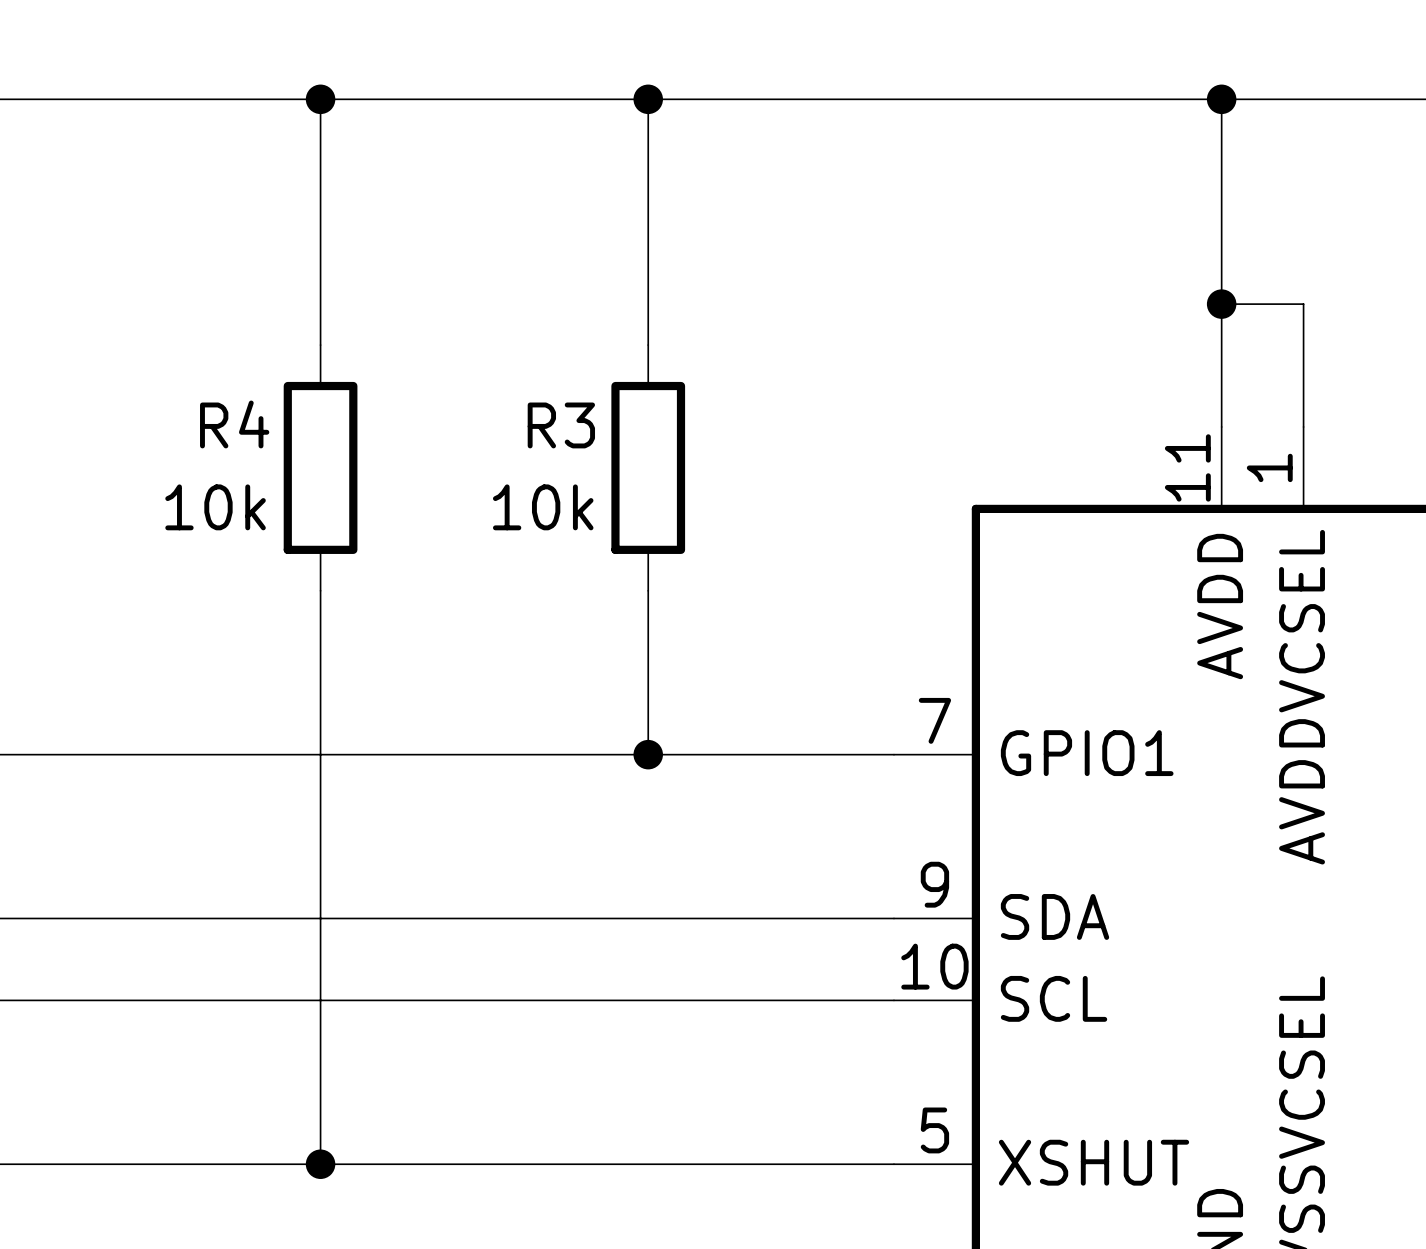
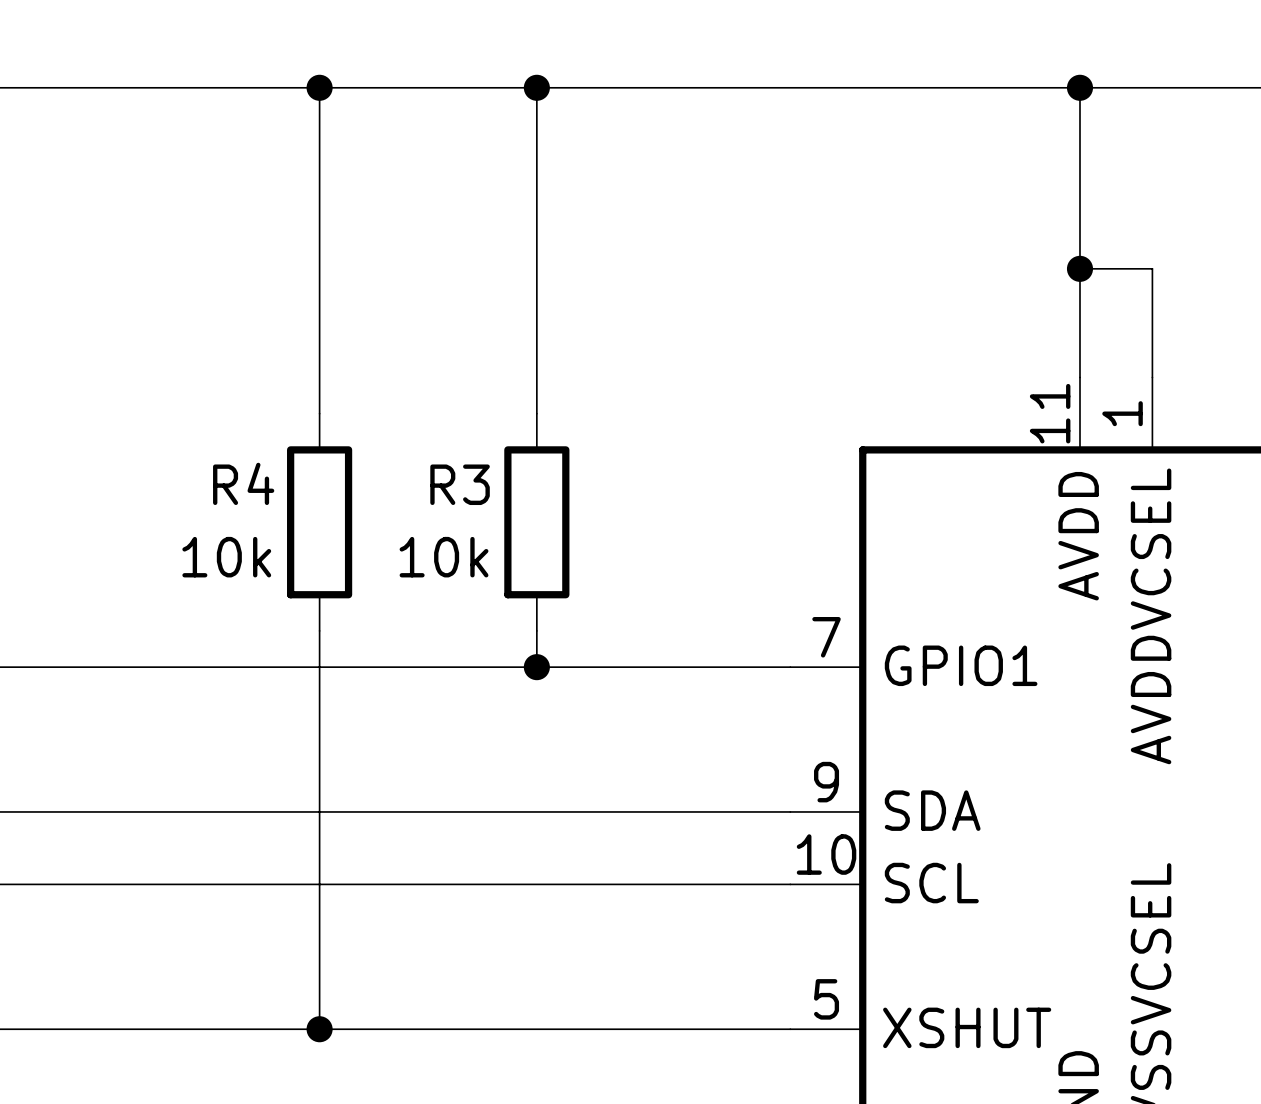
wire: (320, 99) (320, 345) -> none
junction position: (320, 99) -> (319, 87)
wire: none -> (319, 87) (319, 413)
wire: none -> (536, 87) (536, 413)
wire: (648, 99) (648, 345) -> none
junction position: (648, 99) -> (536, 87)
R4 position: (320, 467) -> (319, 522)
R3 position: (648, 467) -> (536, 522)
wire: (320, 590) (320, 1164) -> none
wire: (648, 590) (648, 754) -> none
wire: none -> (319, 630) (319, 1029)
wire: none -> (536, 630) (536, 667)
junction position: (648, 754) -> (536, 667)
junction position: (320, 1164) -> (319, 1029)

